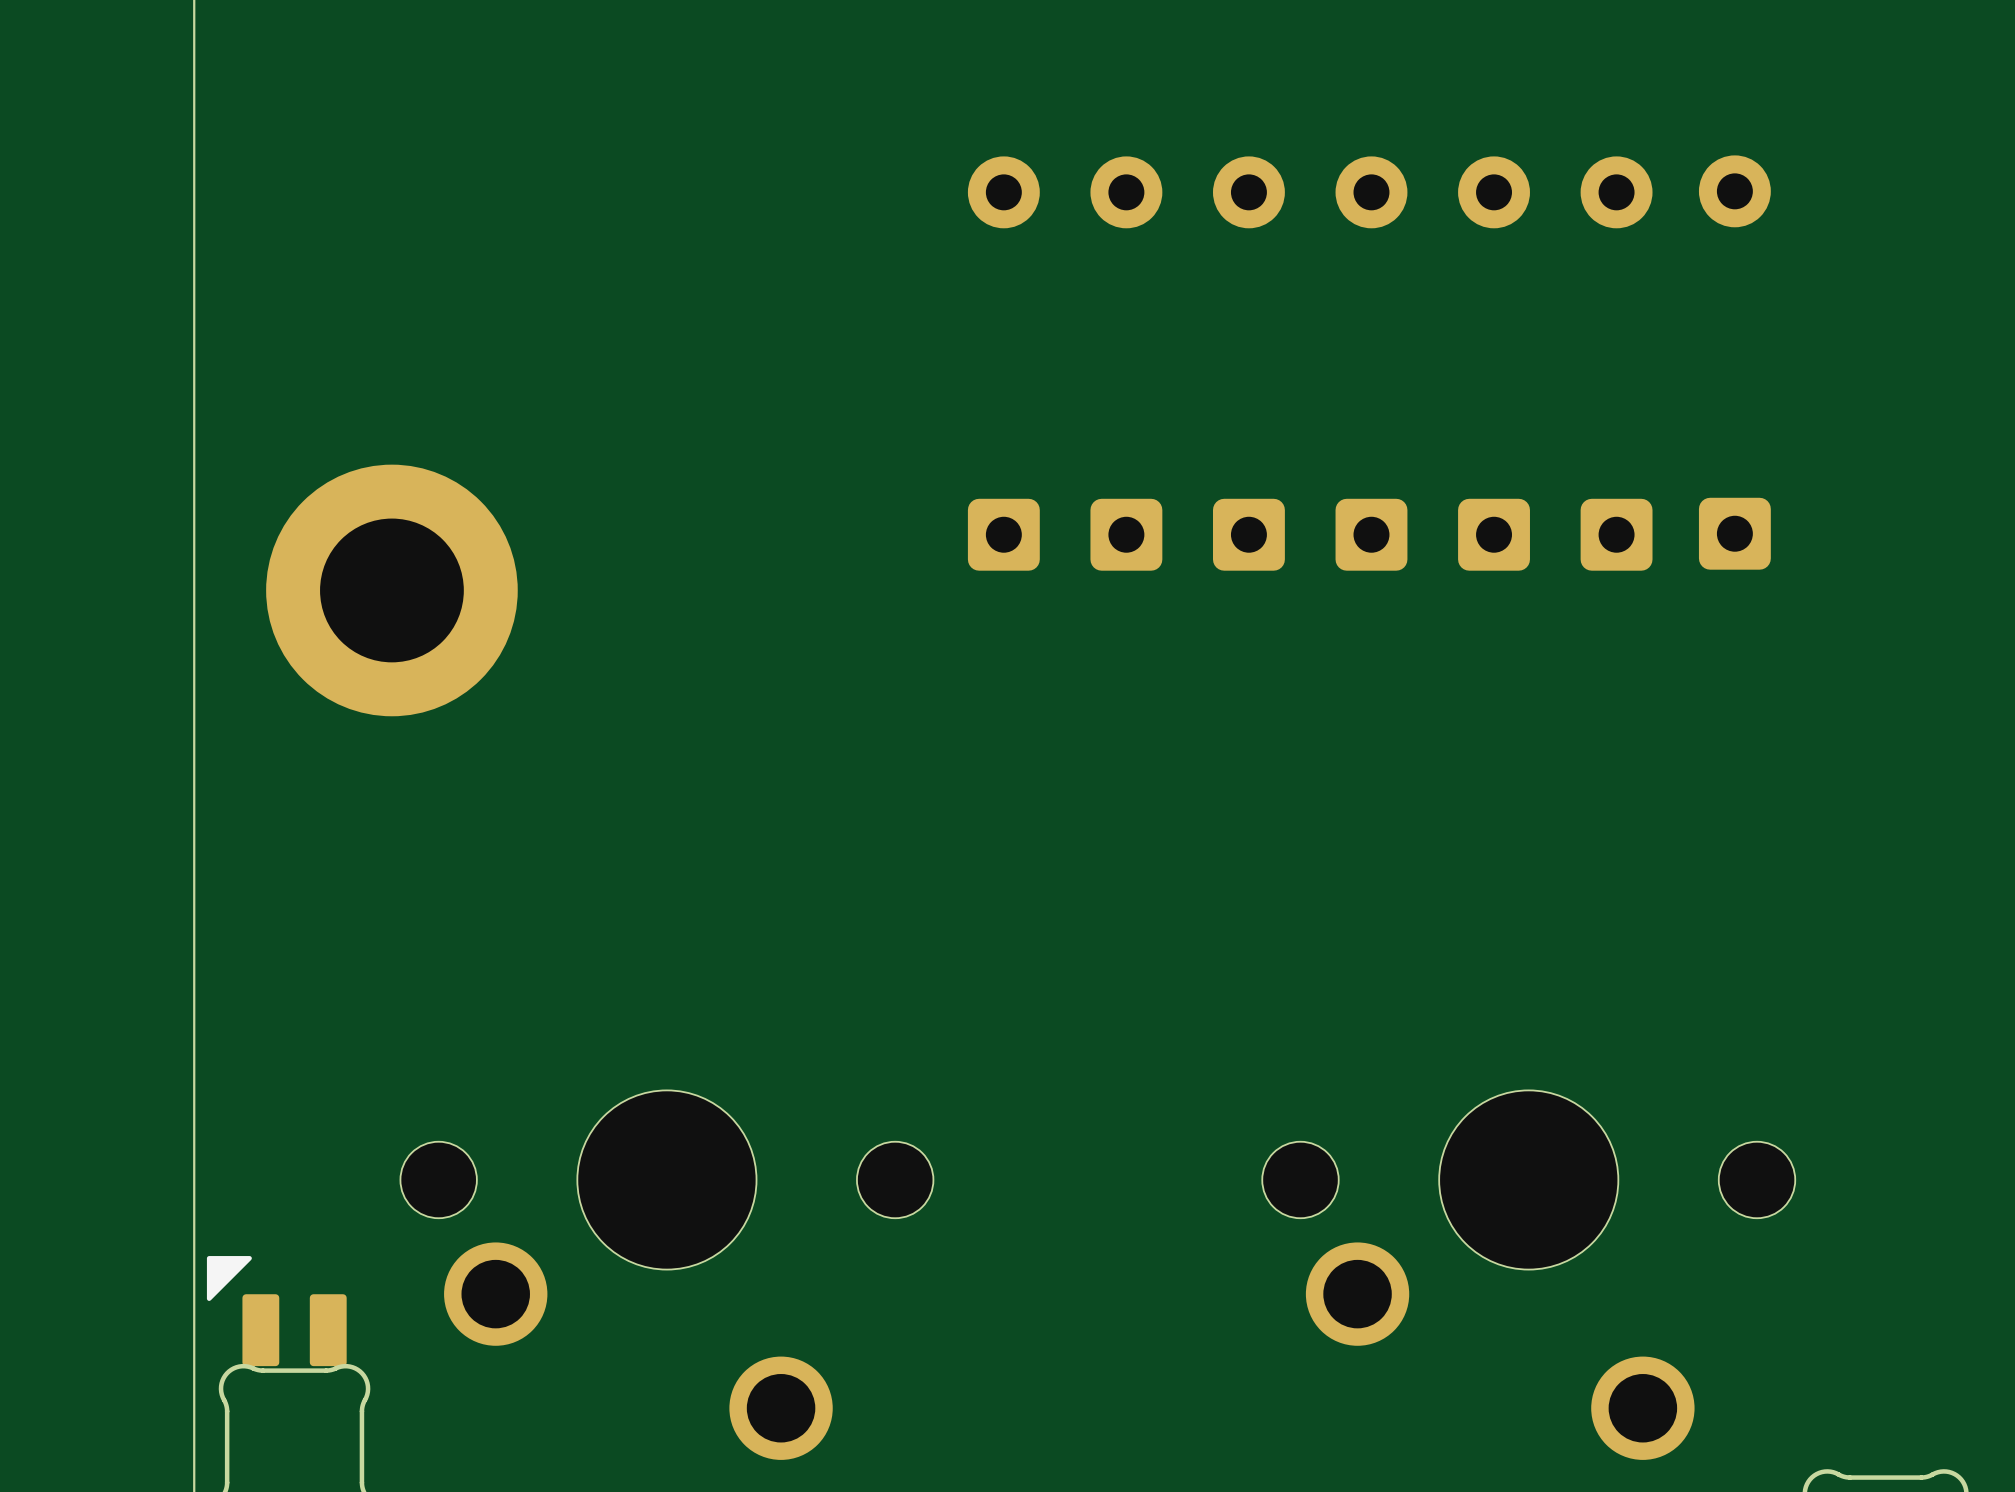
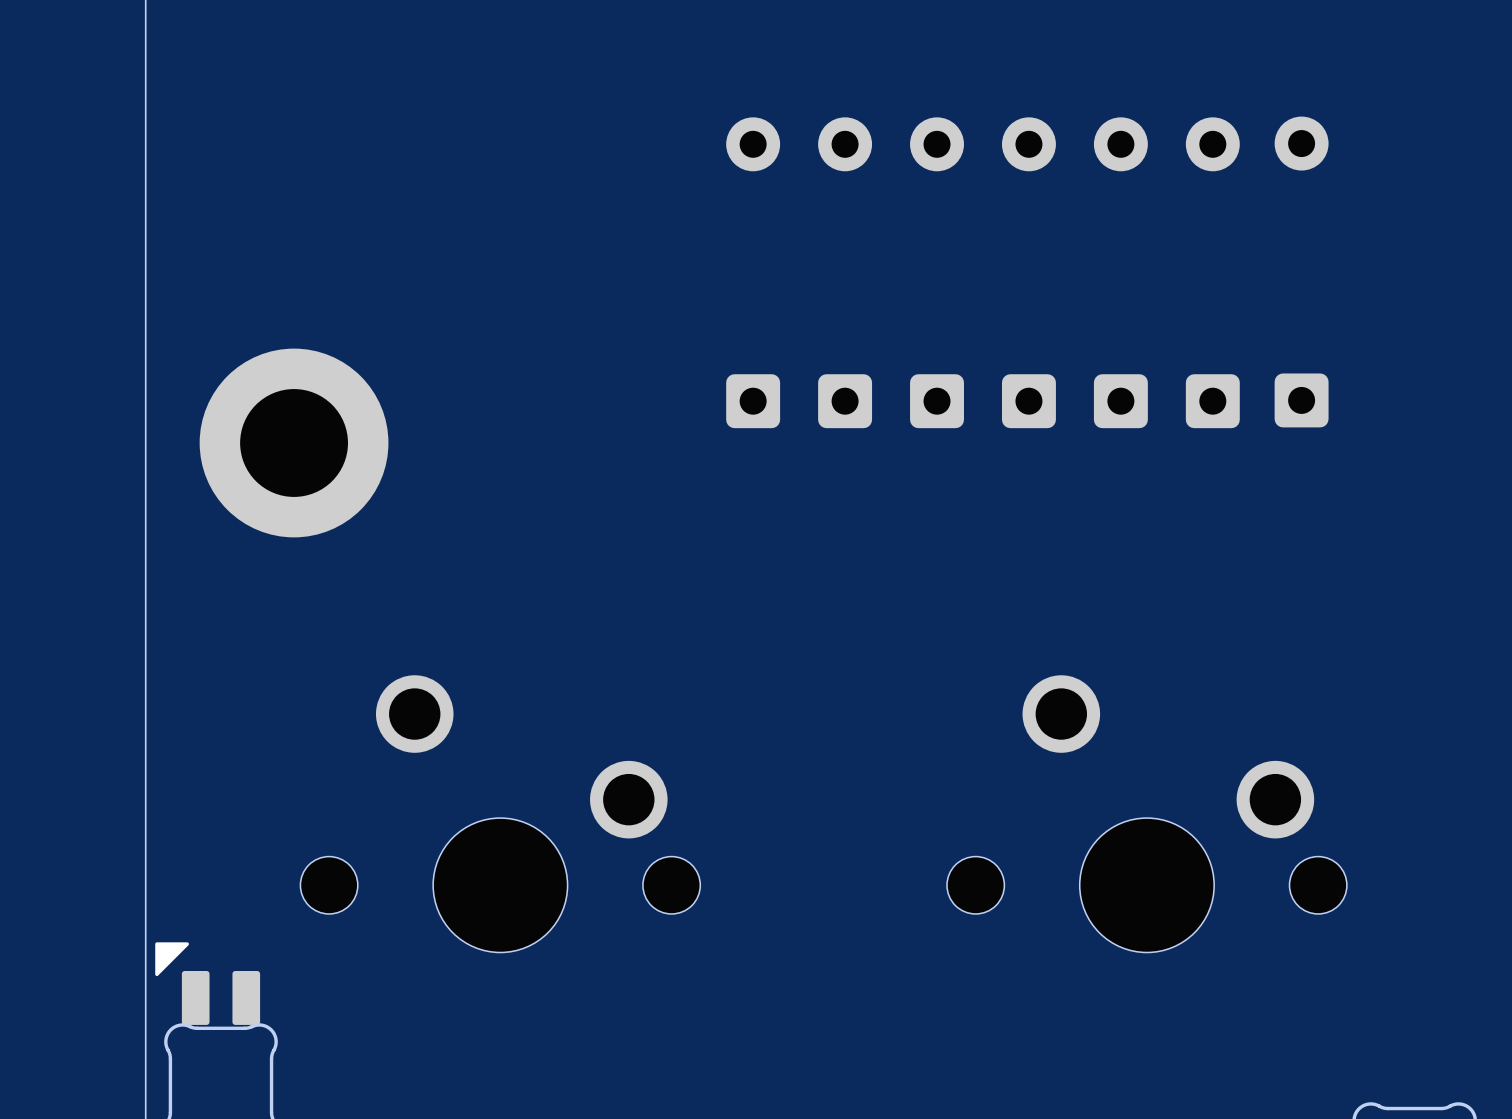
part rotation: 0° (666, 1275) -> 180° (500, 813)
part rotation: 0° (1528, 1275) -> 180° (1146, 813)

